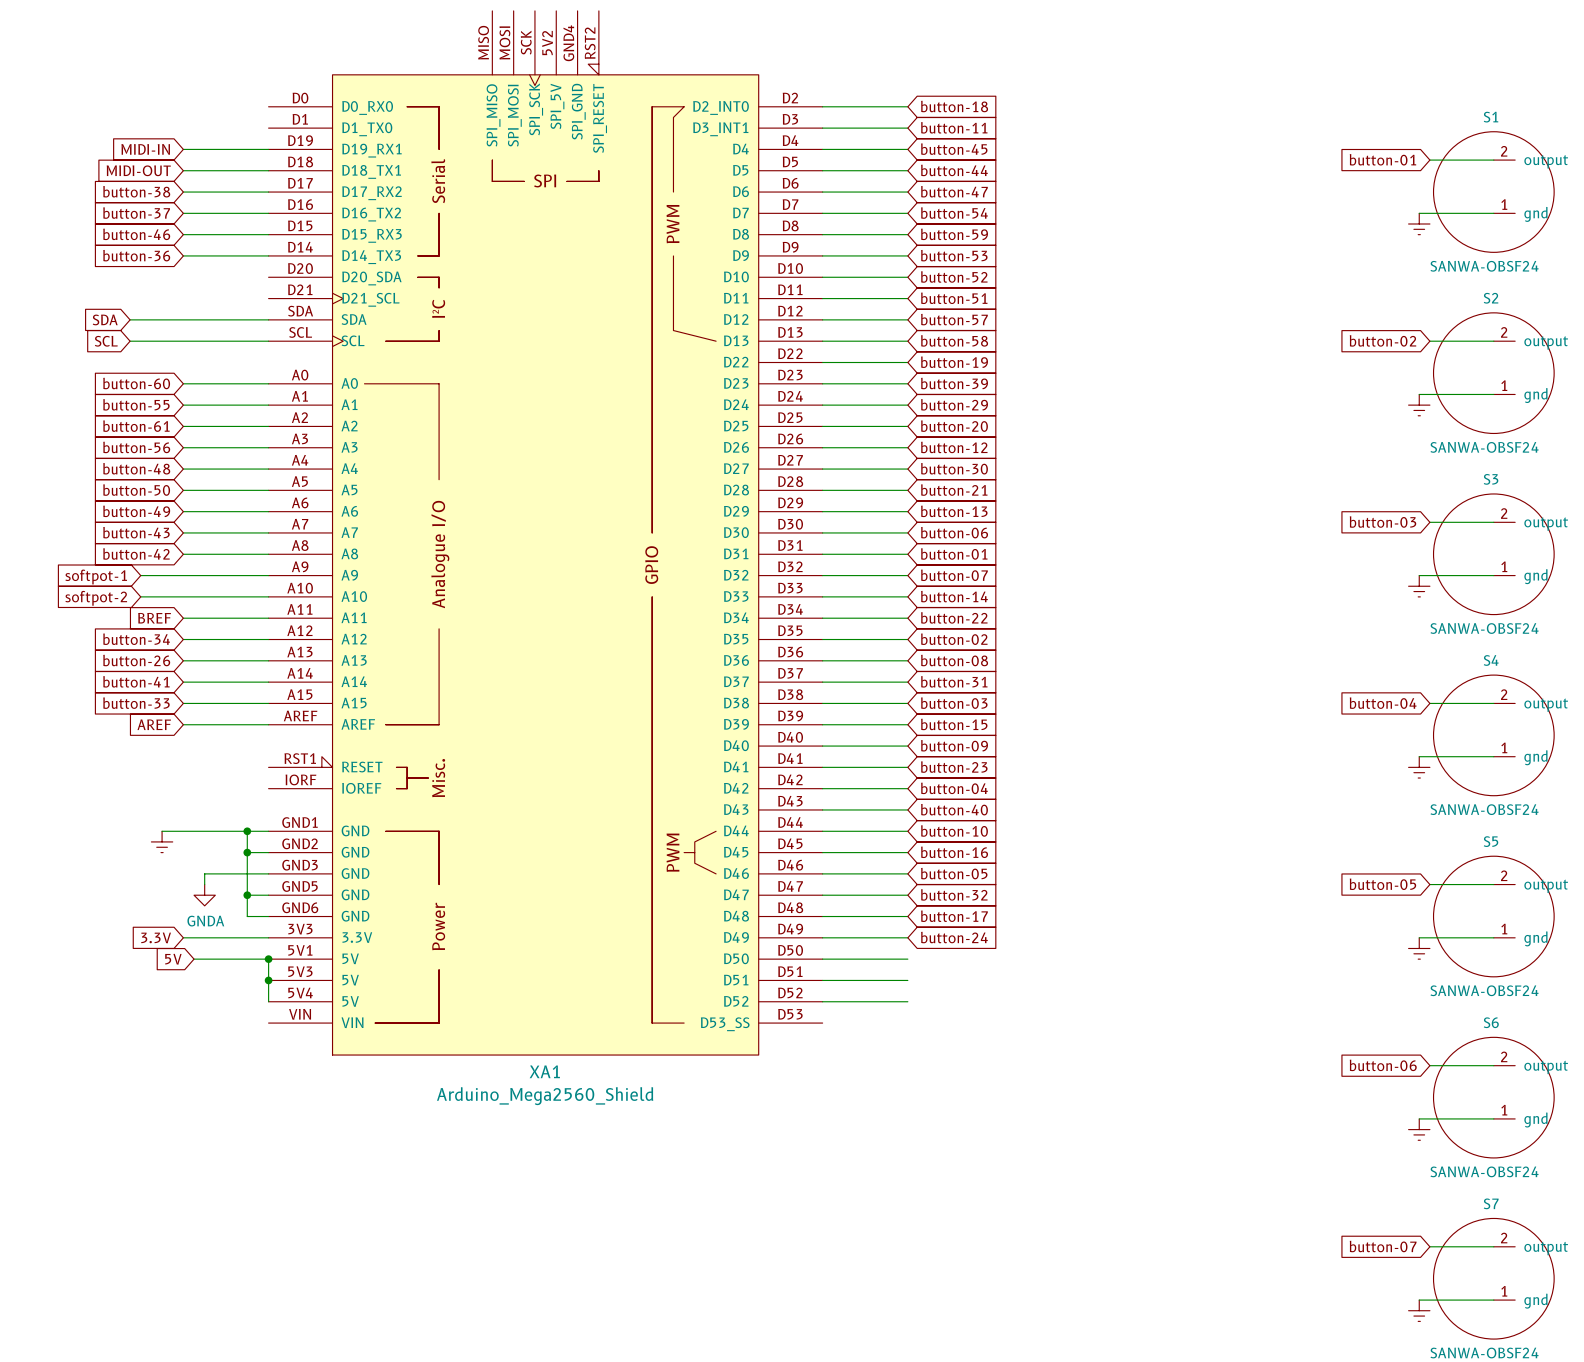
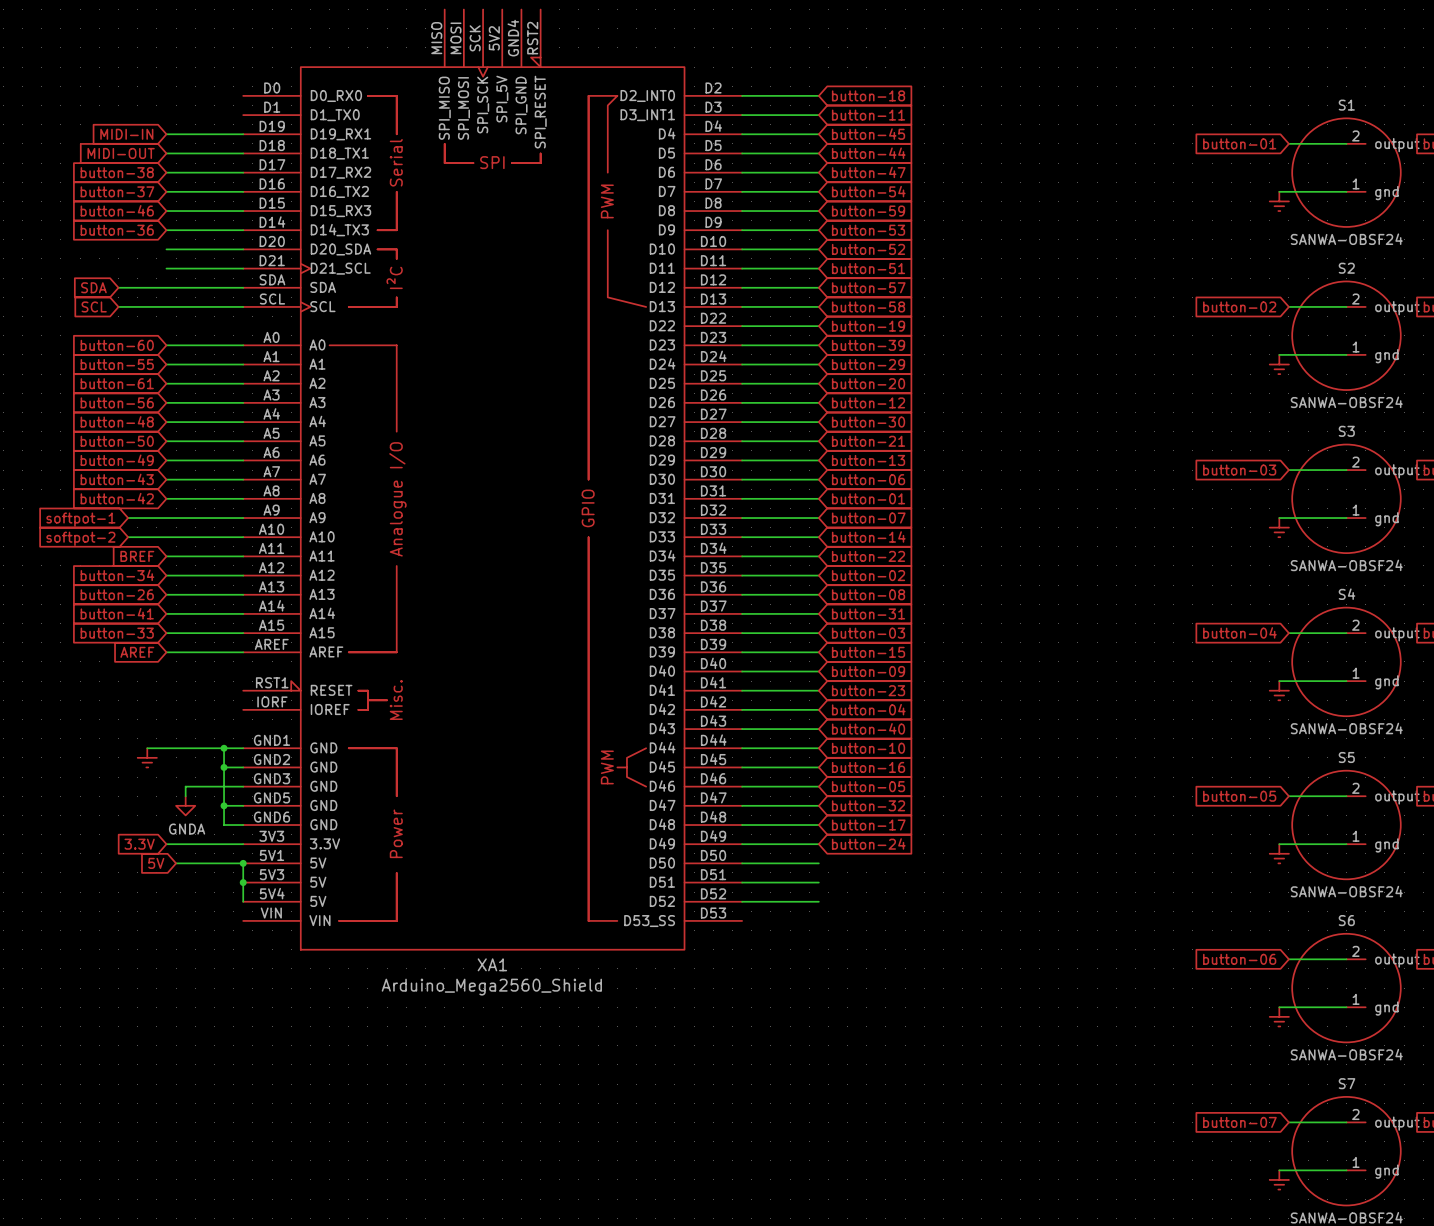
wire: none -> (166, 249) (243, 249)
wire: none -> (166, 268) (243, 268)

